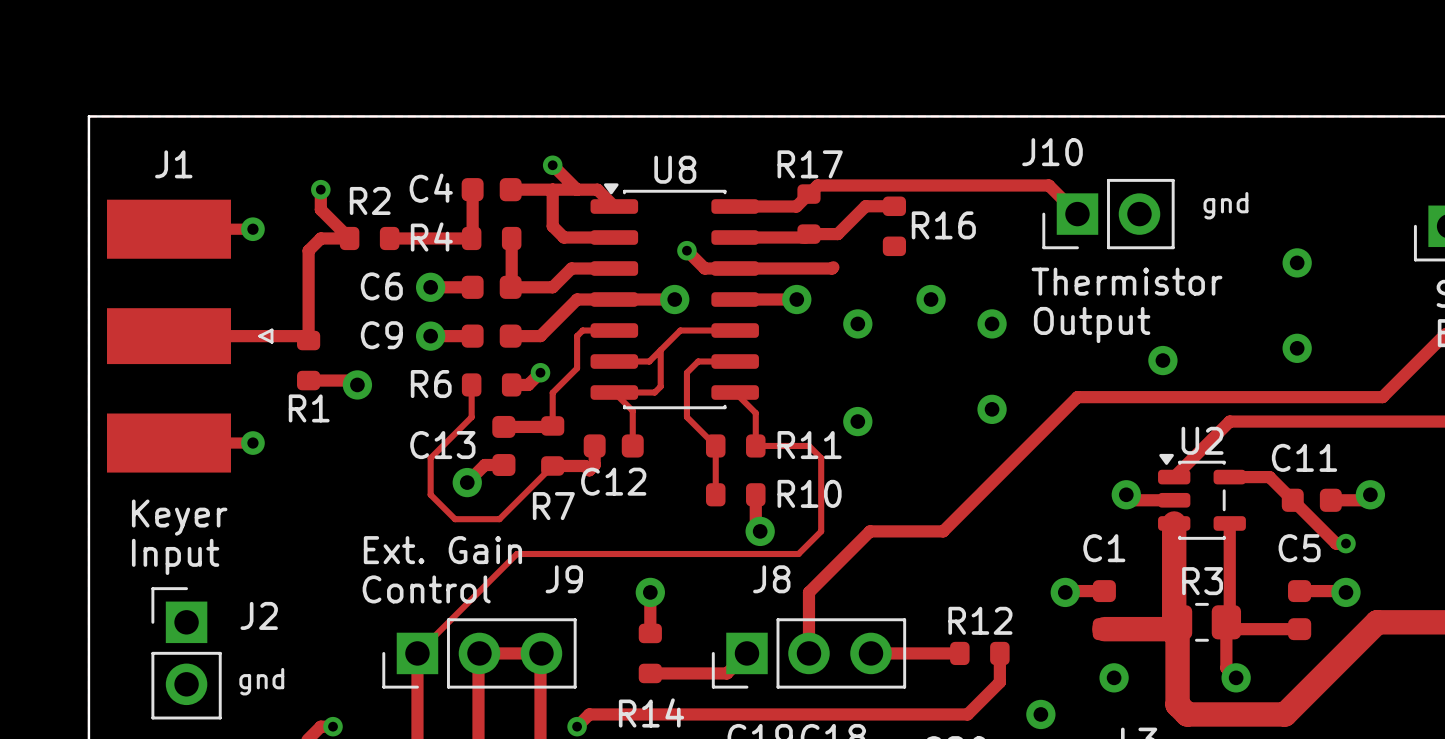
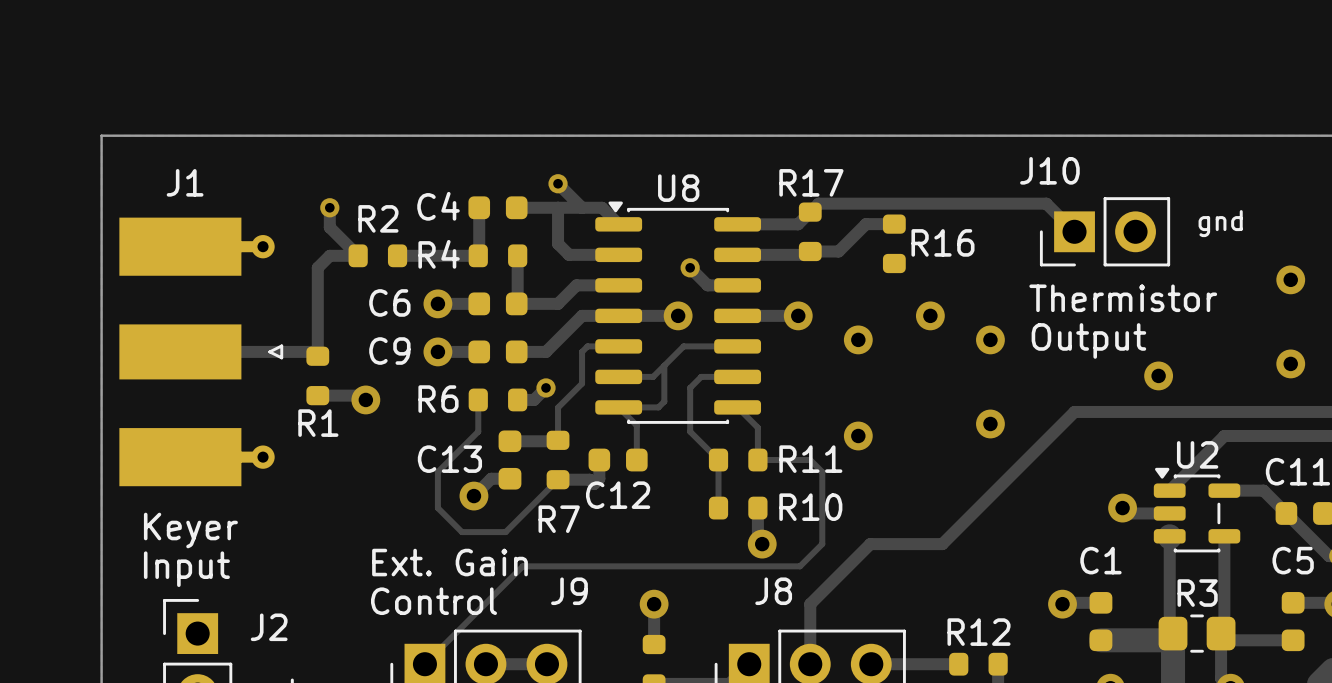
track: (833, 267) (735, 268) -> none
track width: thick (1174, 524) (1174, 618) -> thin (1169, 537) (1169, 630)

